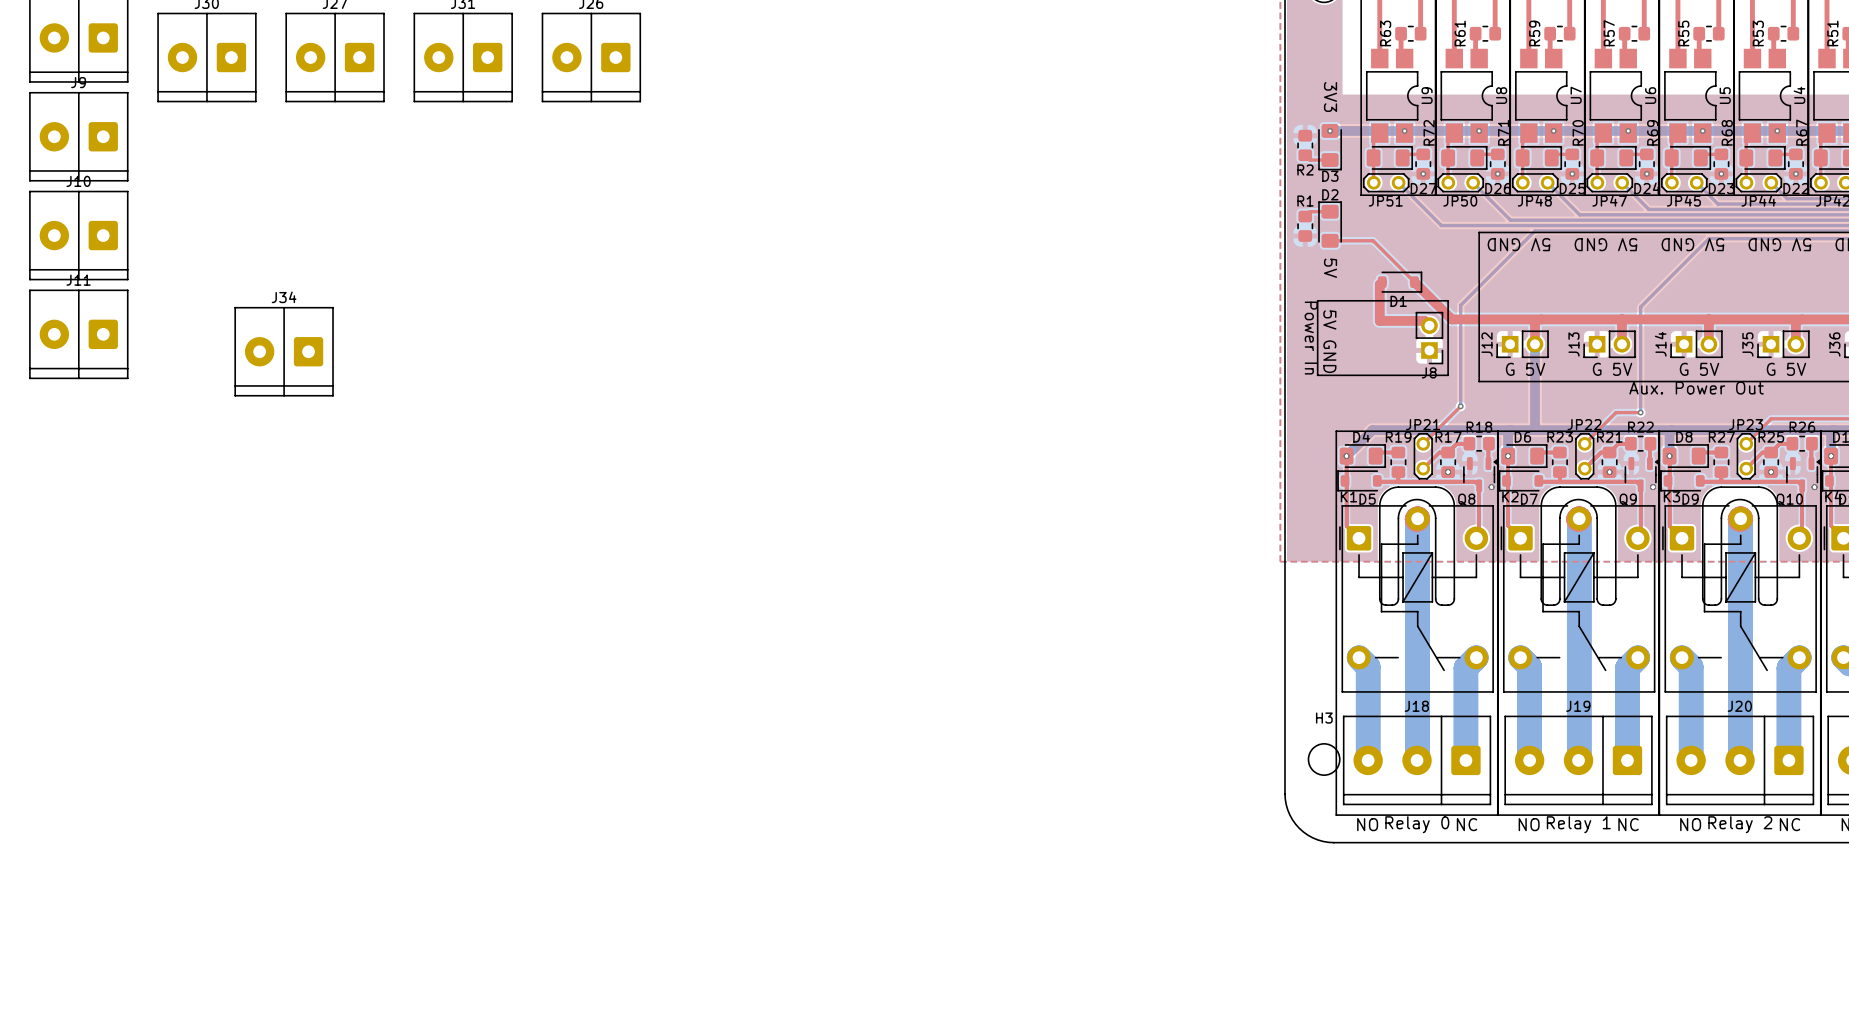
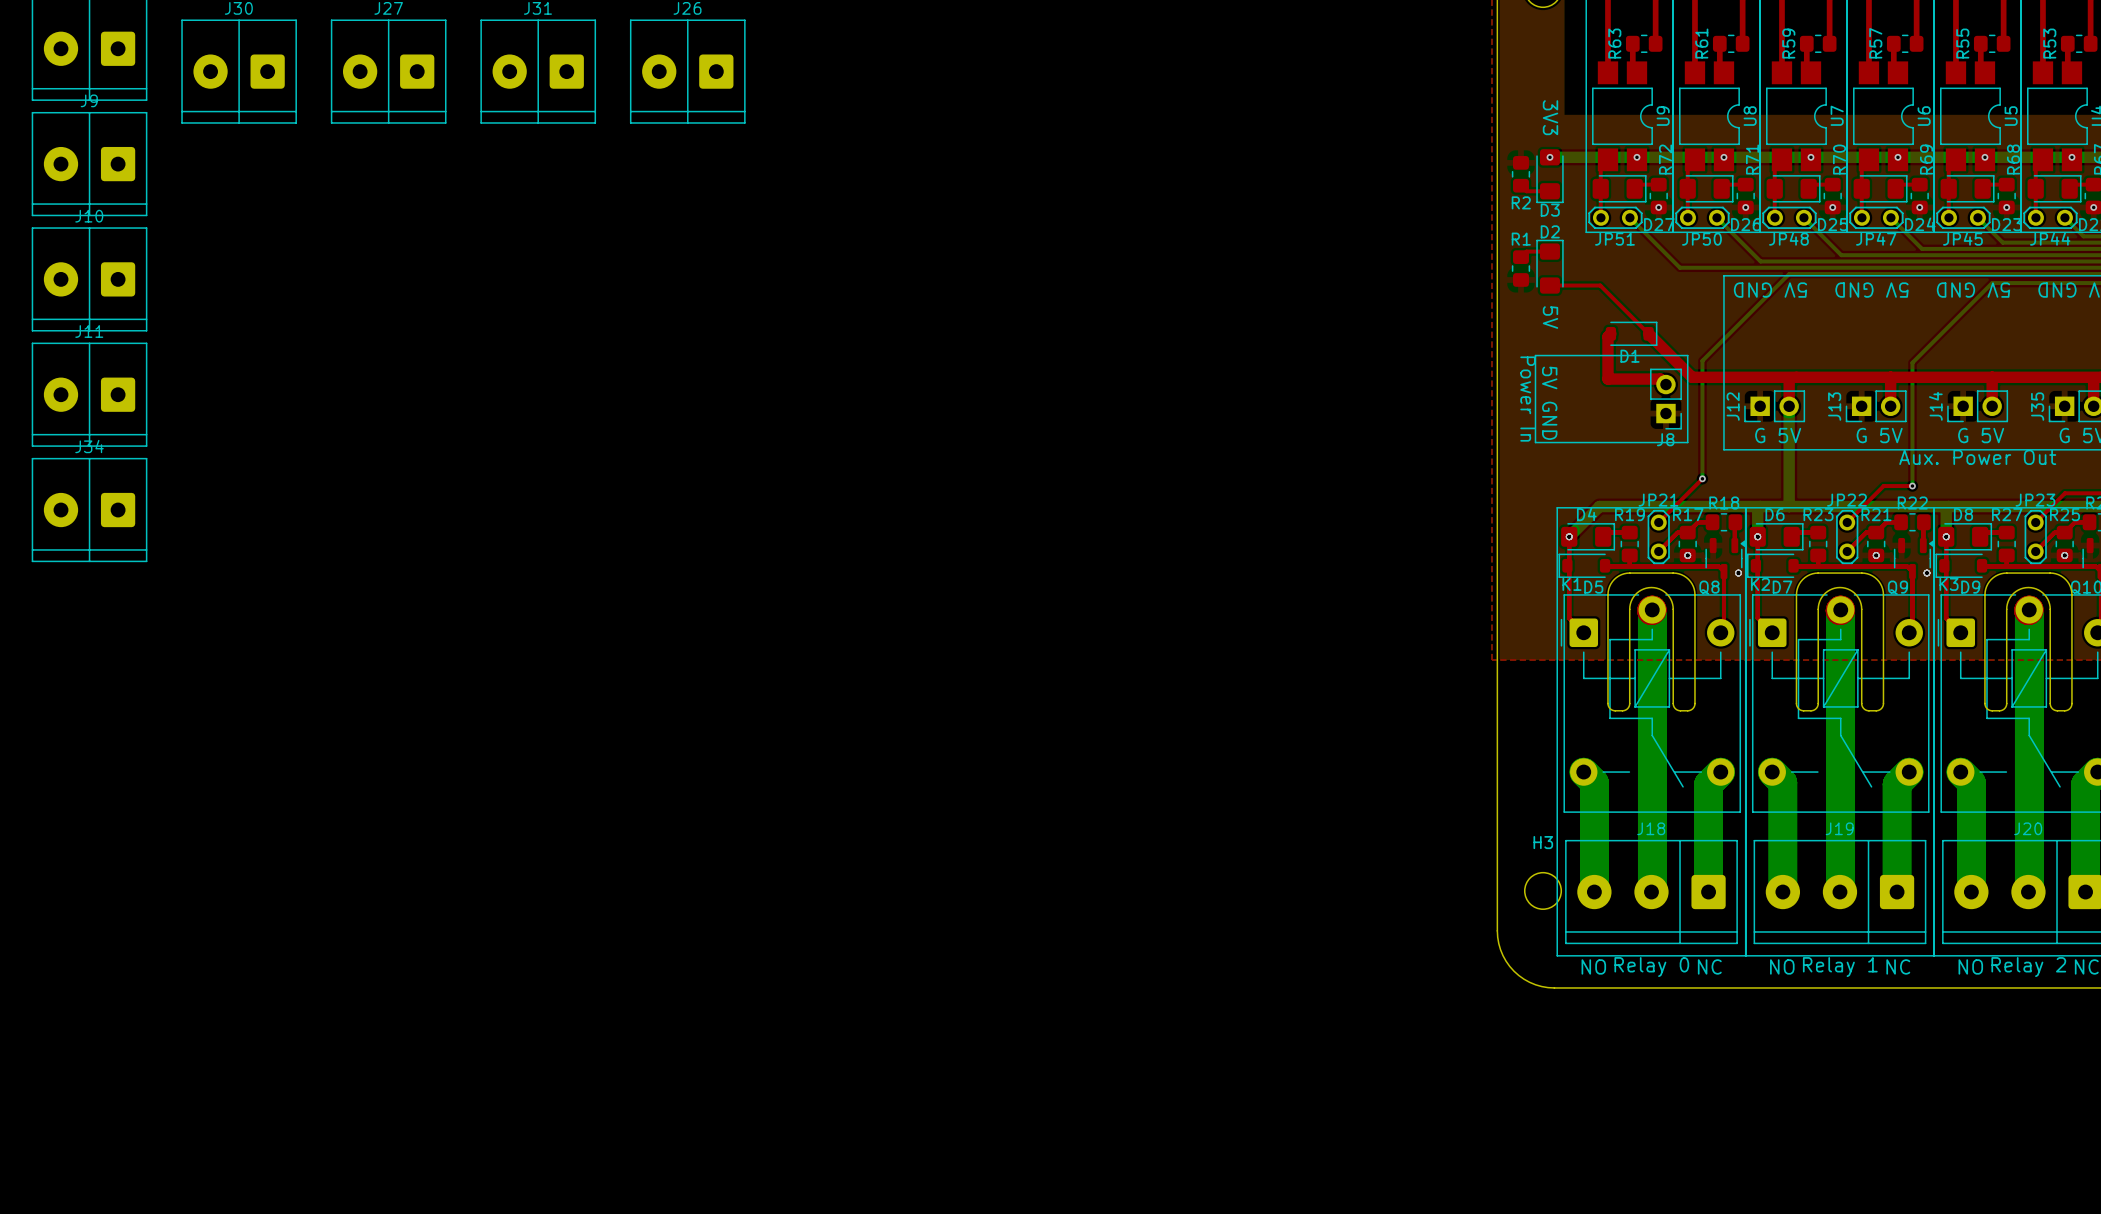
J34 position: (284, 351) -> (89, 510)

